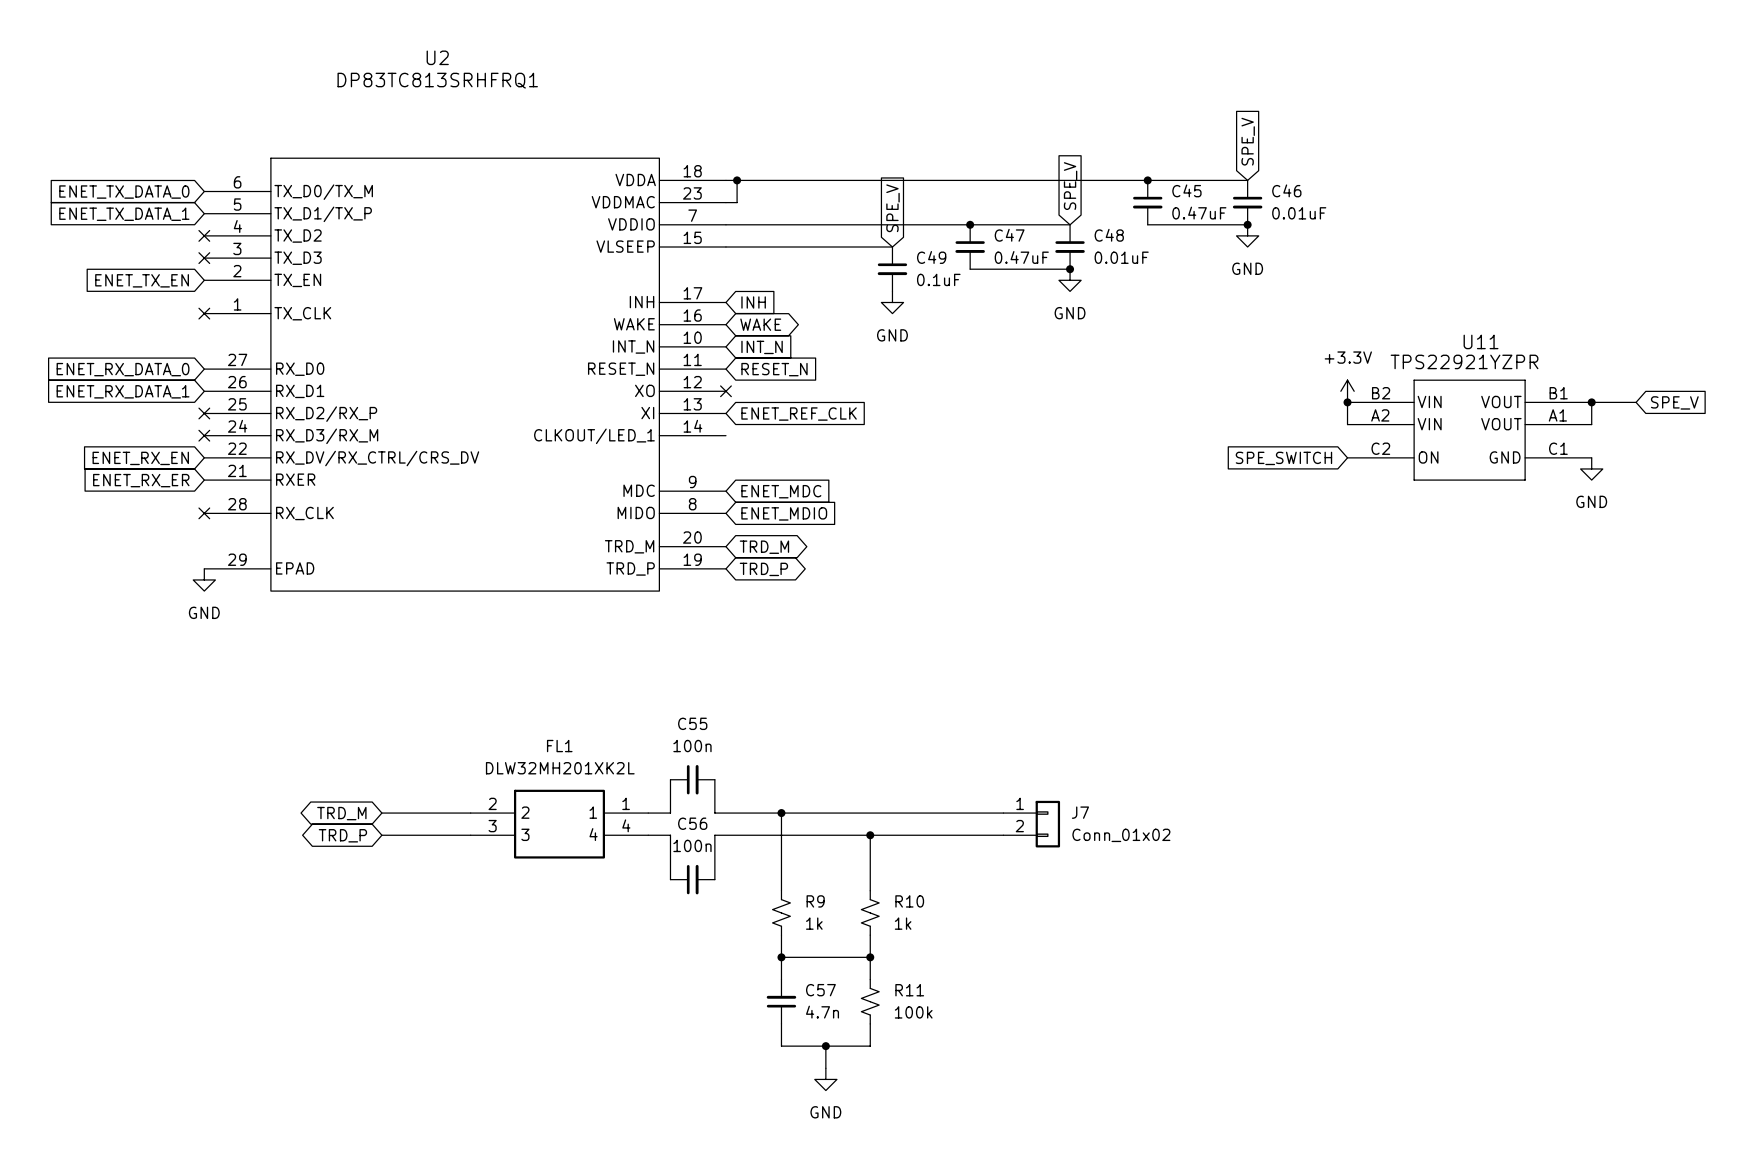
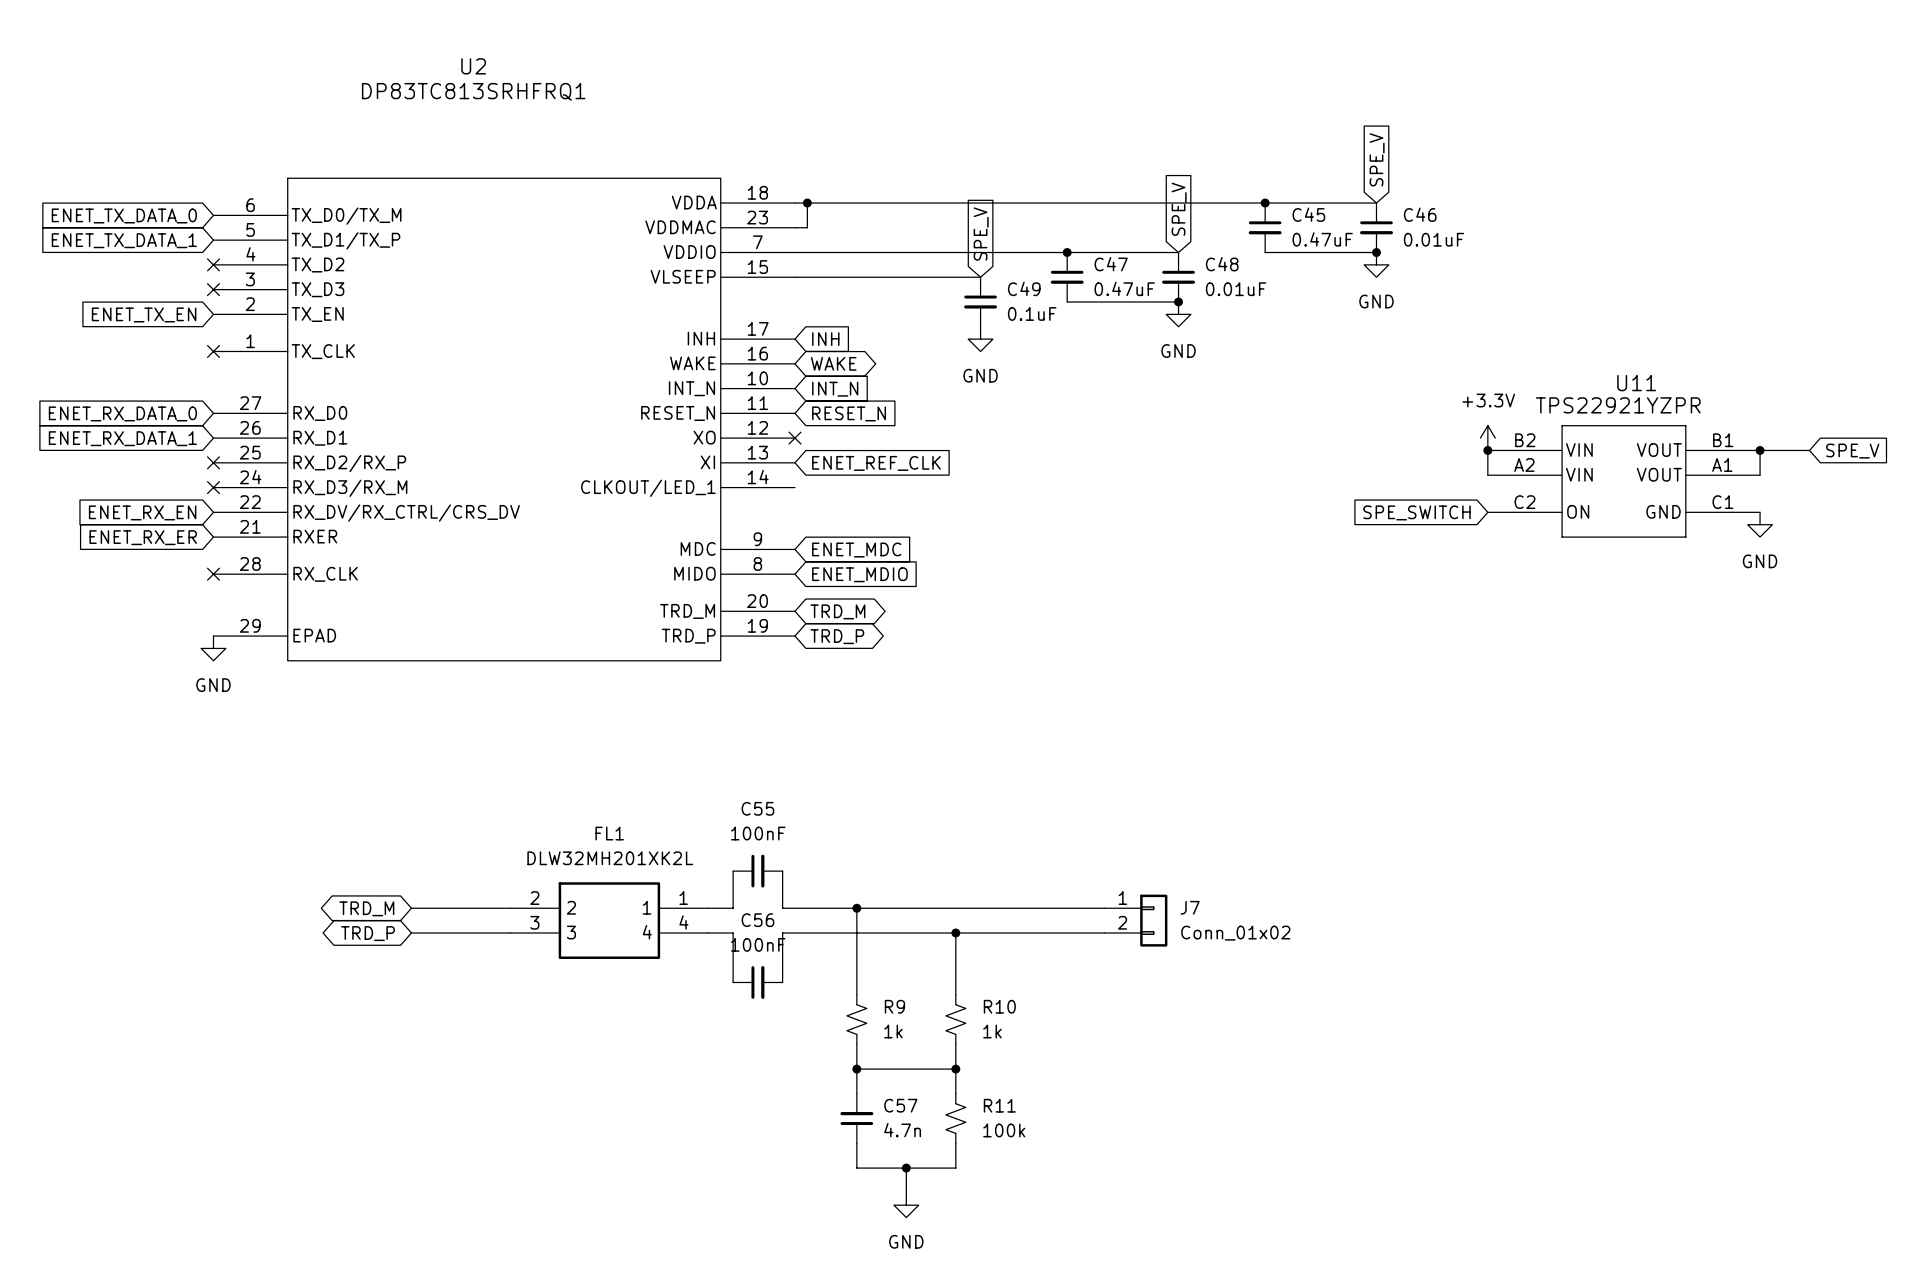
C55 value: 100n (692, 746) -> 100nF (758, 833)
C56 value: 100n (692, 845) -> 100nF (758, 944)

